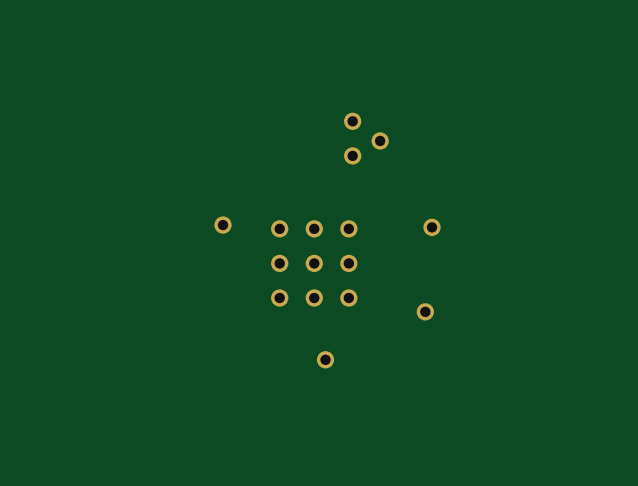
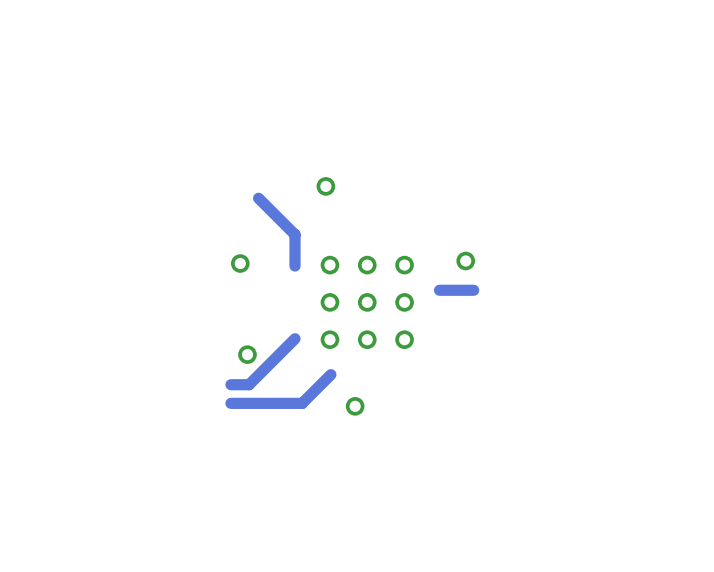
via: (352, 121) -> none
via: (380, 140) -> none
via: none -> (325, 186)
via: (352, 155) -> none
track: none -> (258, 198) (295, 234) (295, 266)
via position: (223, 225) -> (240, 263)
via position: (432, 227) -> (465, 261)
track: none -> (473, 290) (439, 290)
track: none -> (295, 338) (249, 384) (230, 384)
via: none -> (247, 354)
via: (425, 311) -> none
track: none -> (330, 374) (302, 403) (230, 403)
via position: (325, 359) -> (355, 406)

